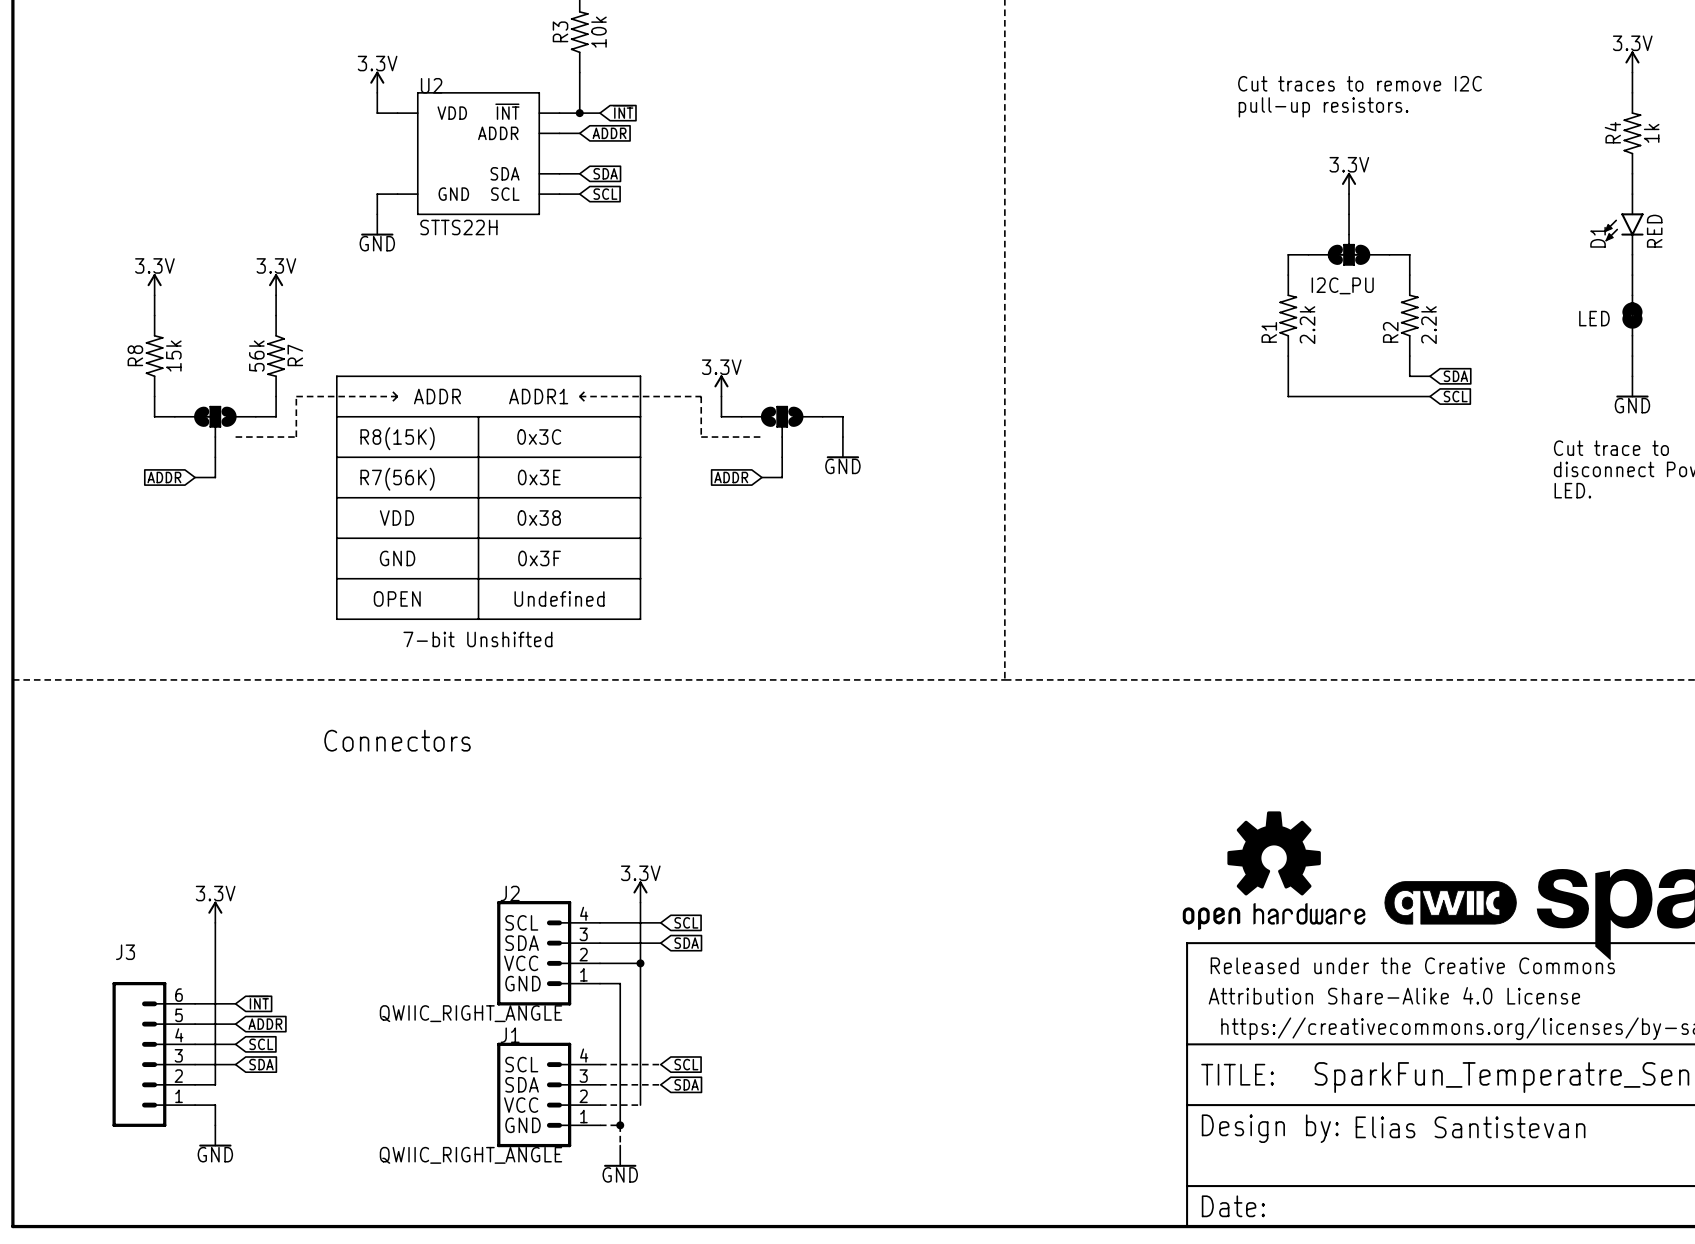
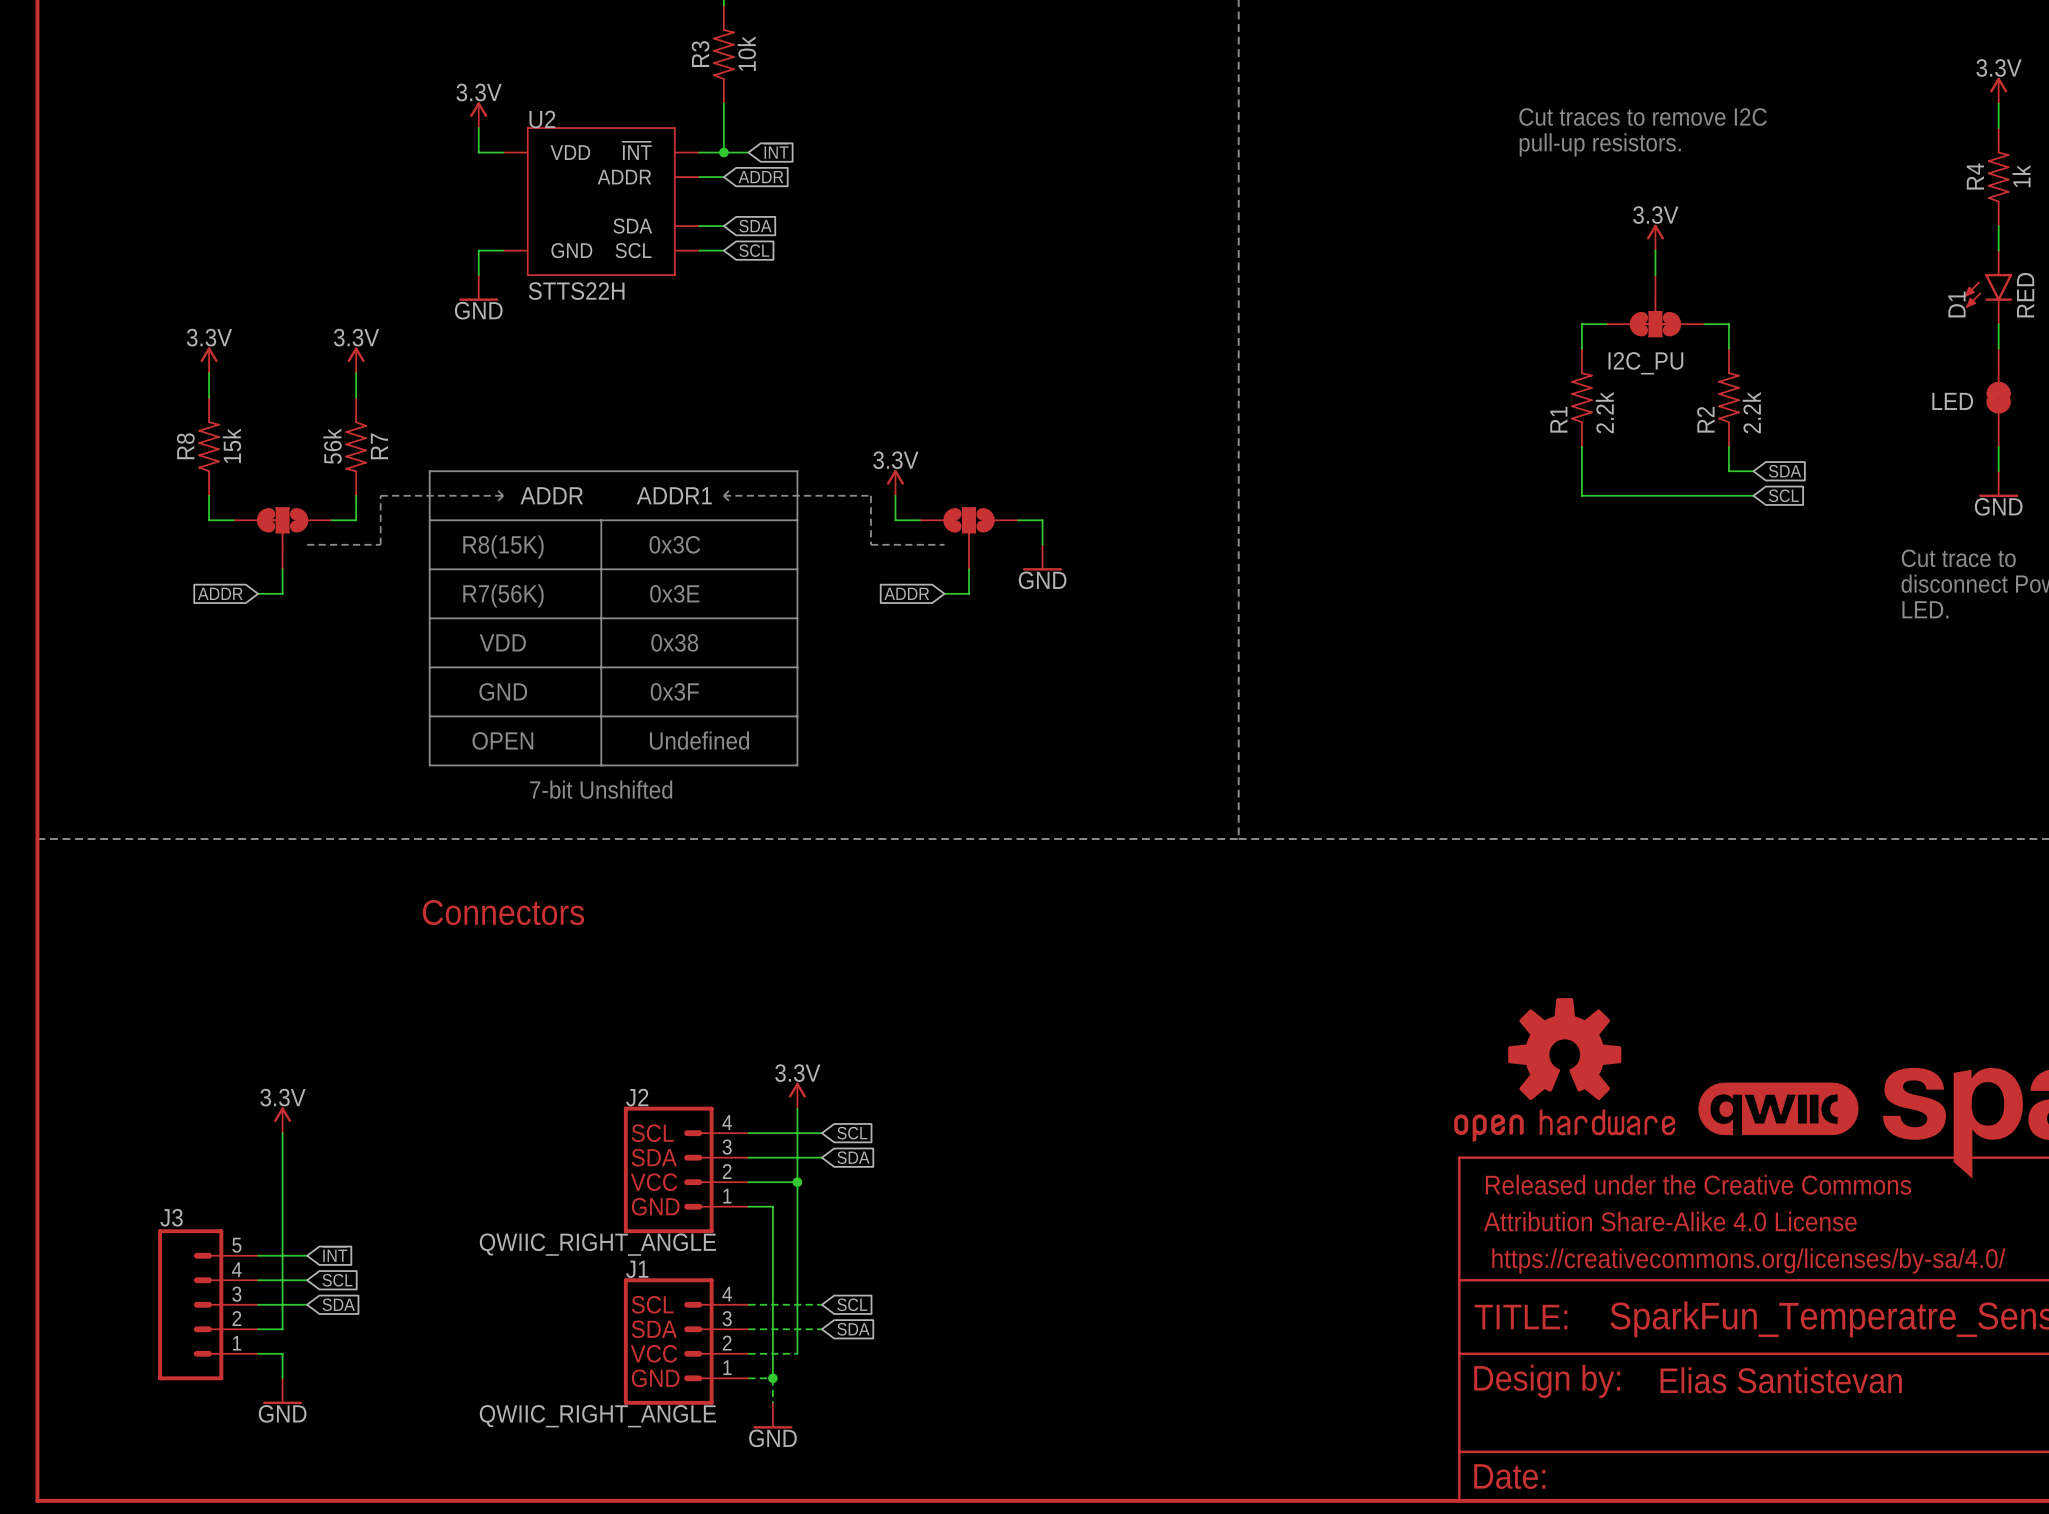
J3 name position: J3 (125, 952) -> J3 (171, 1217)
J3 symbol: [112, 981, 196, 1127] -> [158, 1229, 259, 1381]
global label: ~{INT} (258, 1002) -> none
wire: (195, 1003) (235, 1003) -> none
global label: ADDR (265, 1024) -> ~{INT} (335, 1254)

